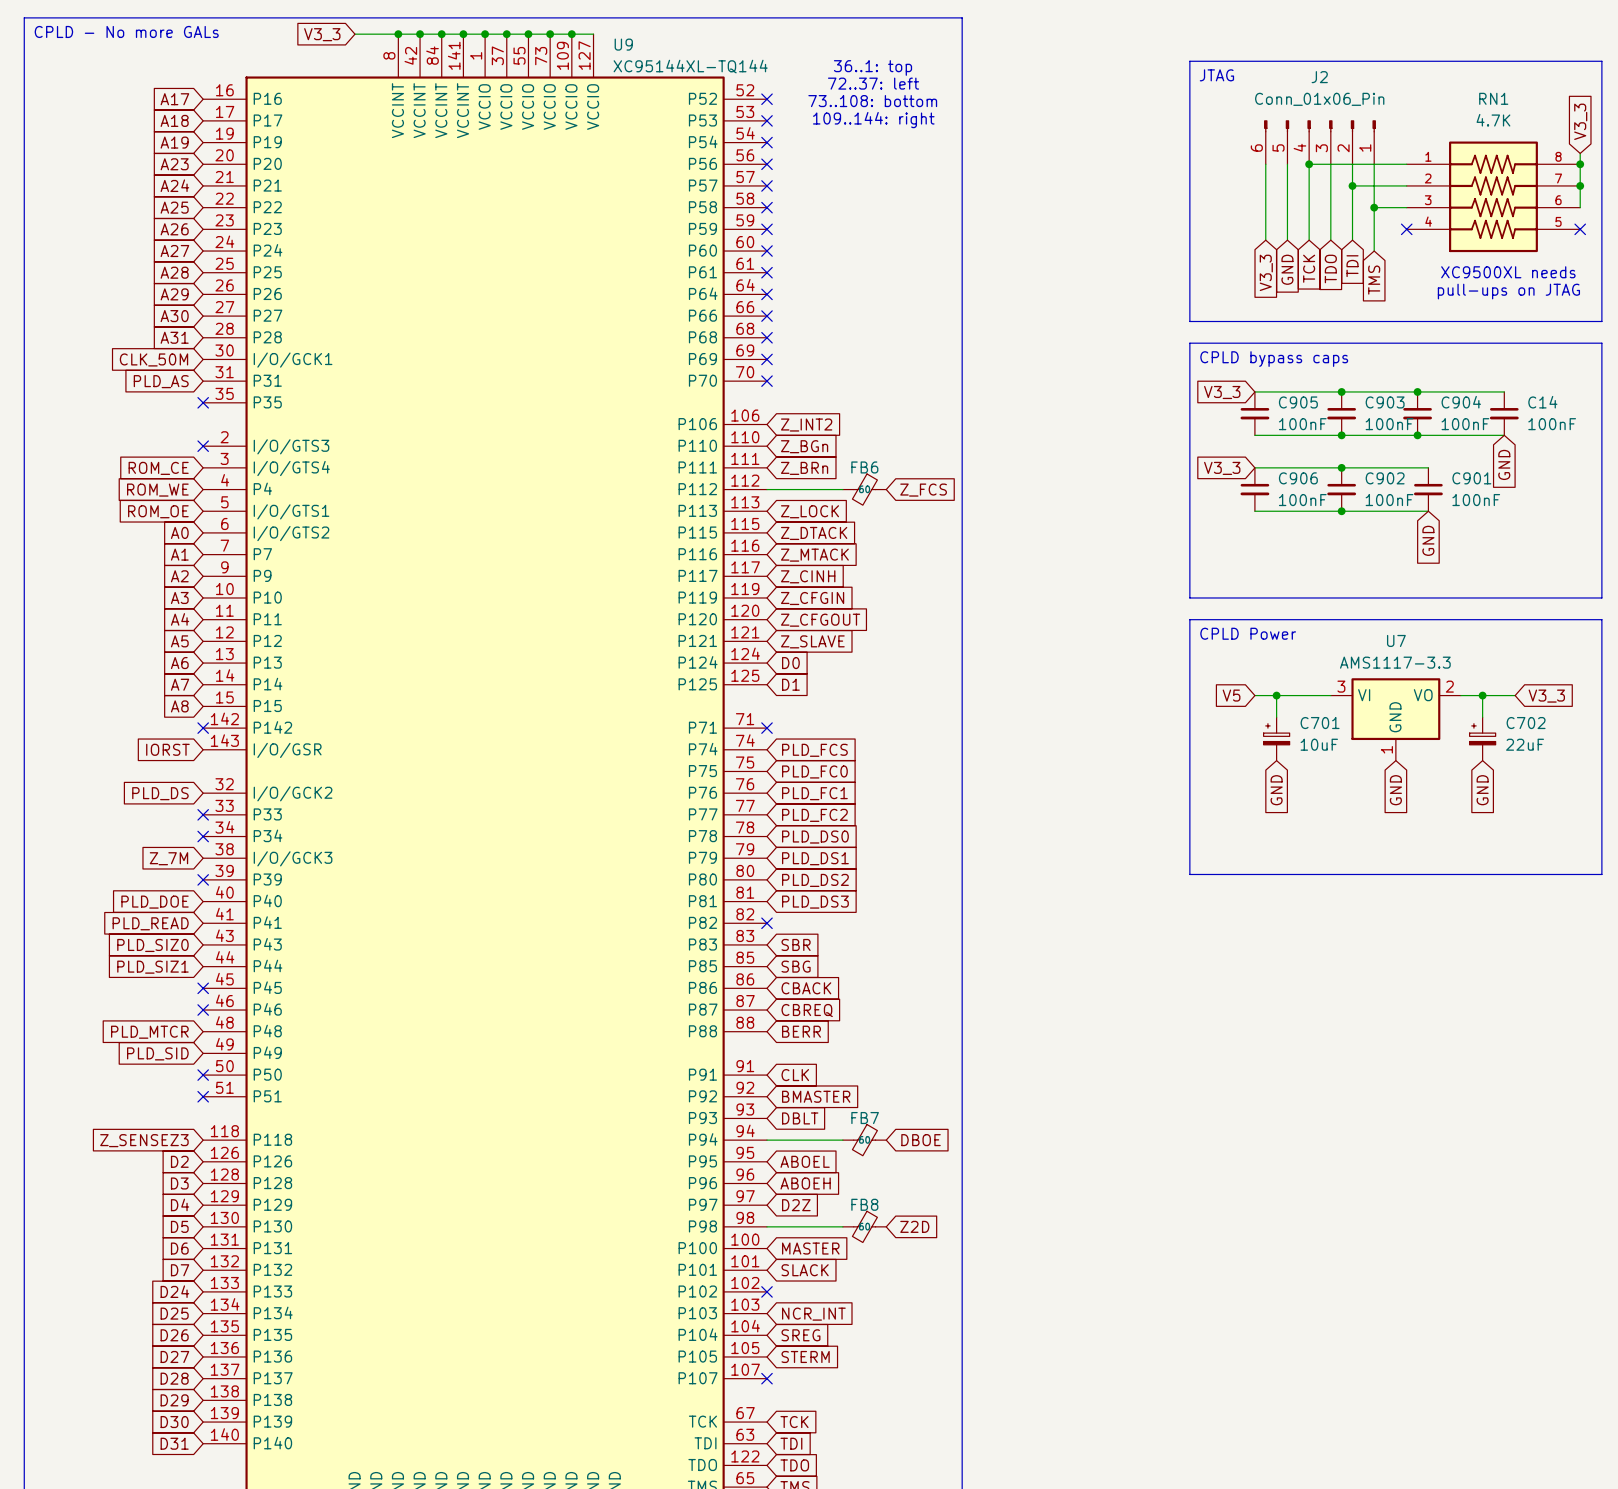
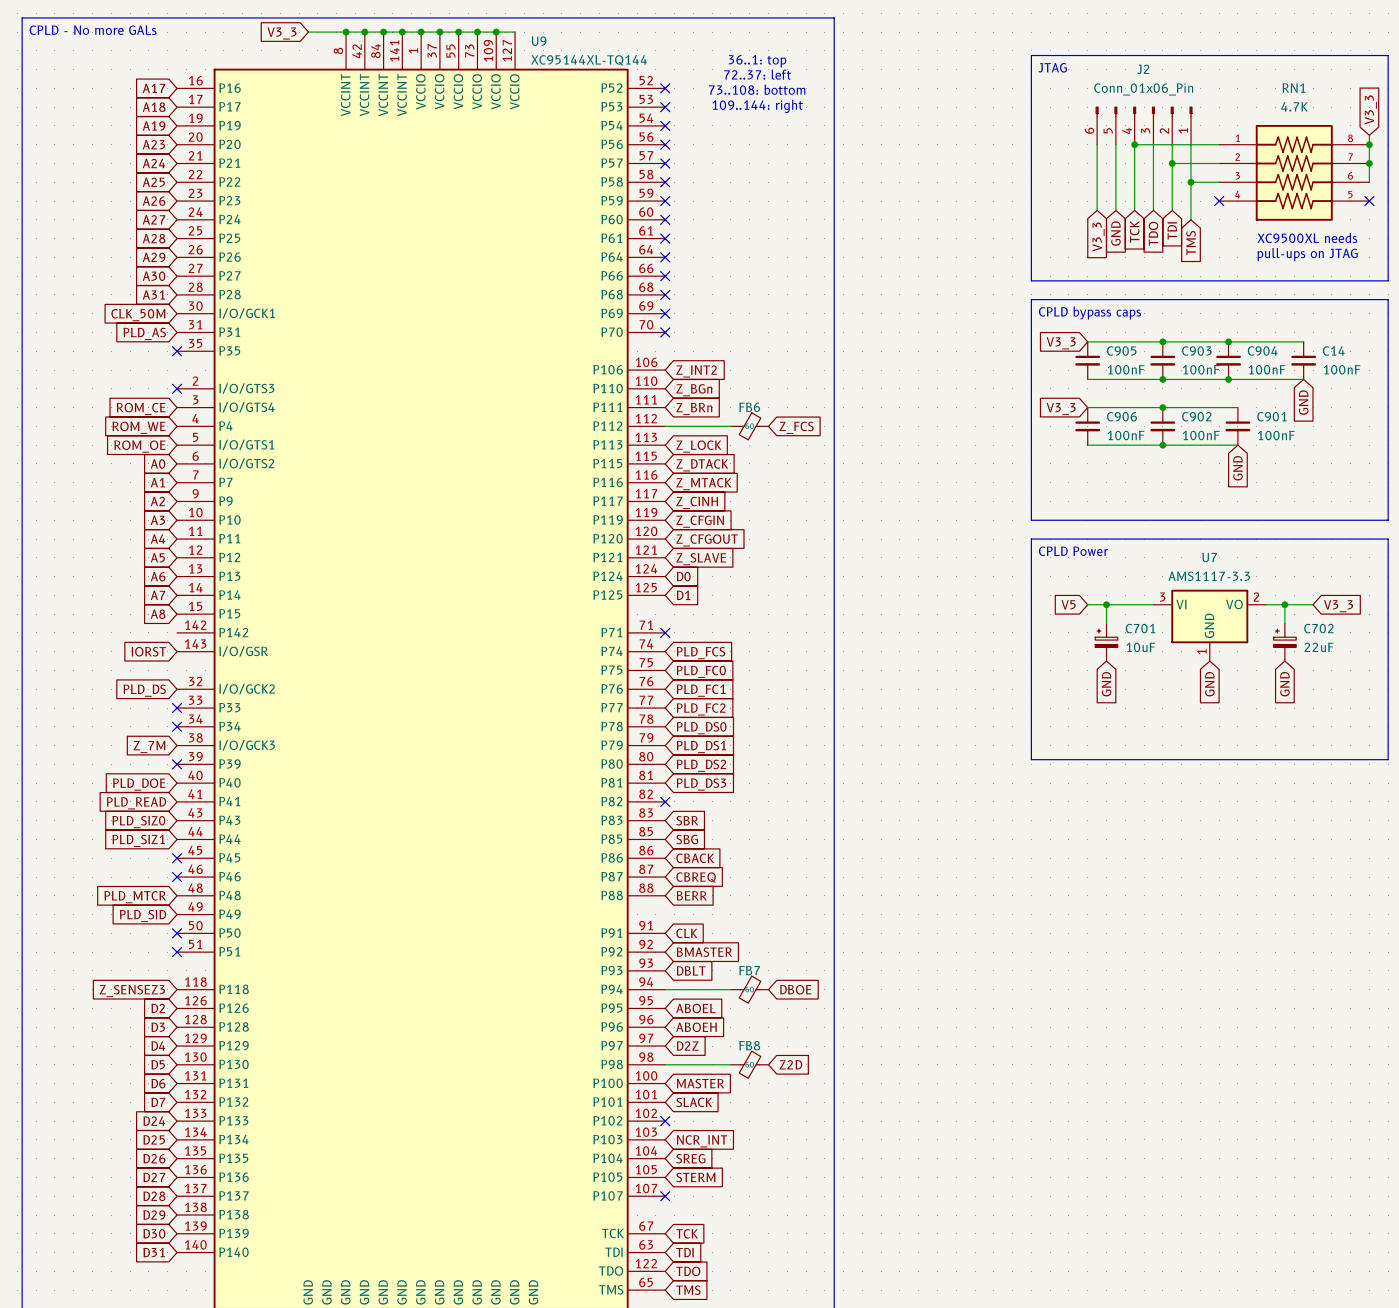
no-connect mark: (203, 728) -> none

